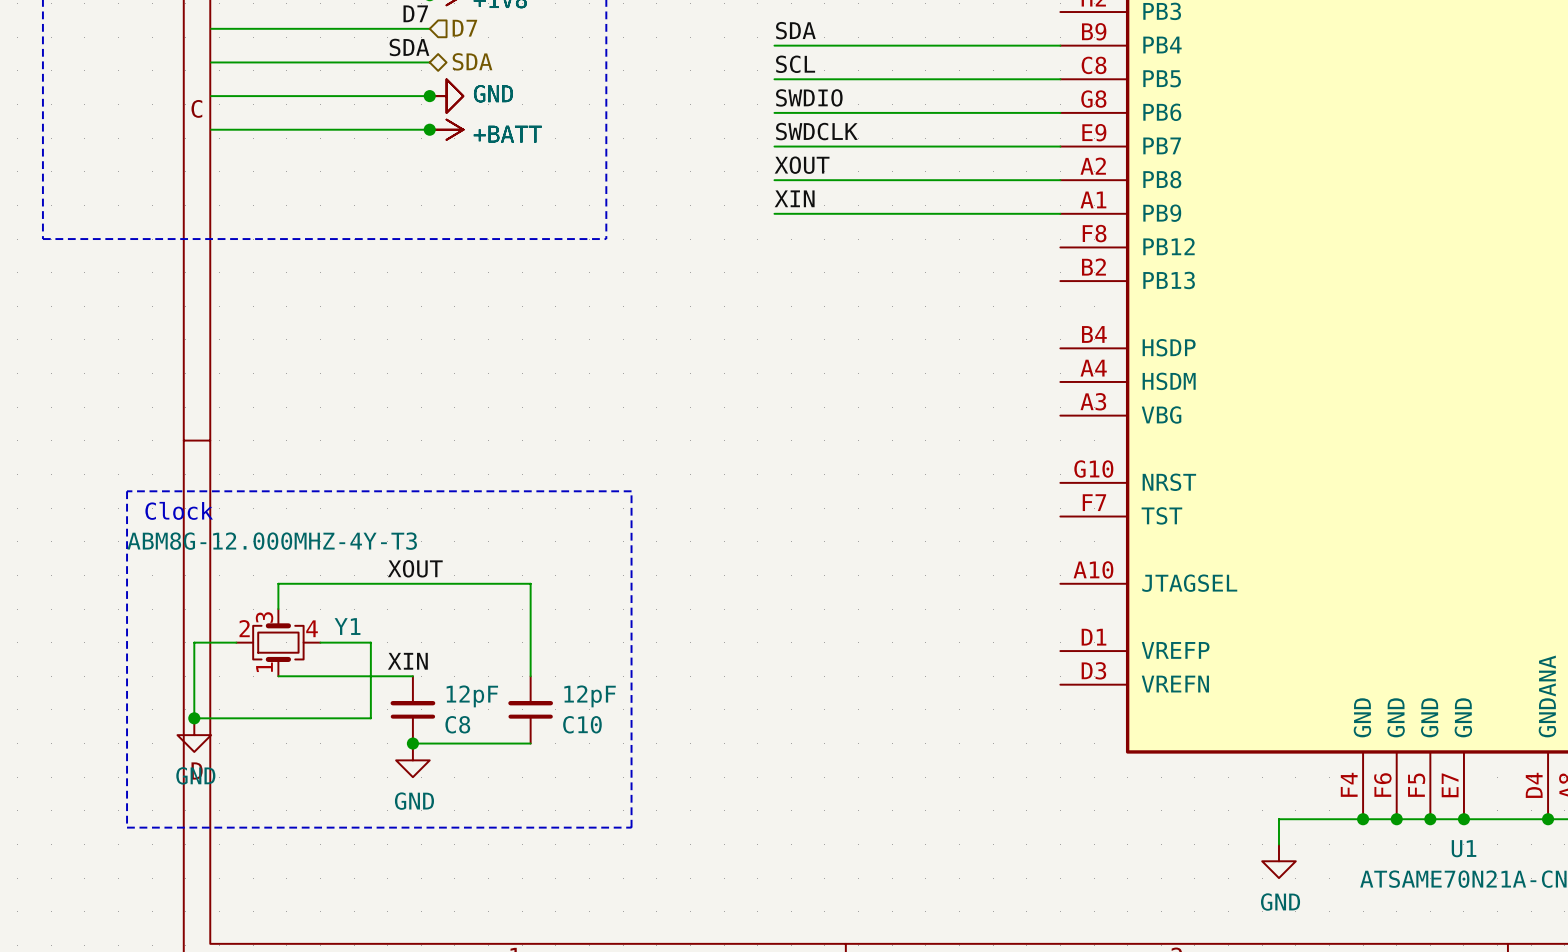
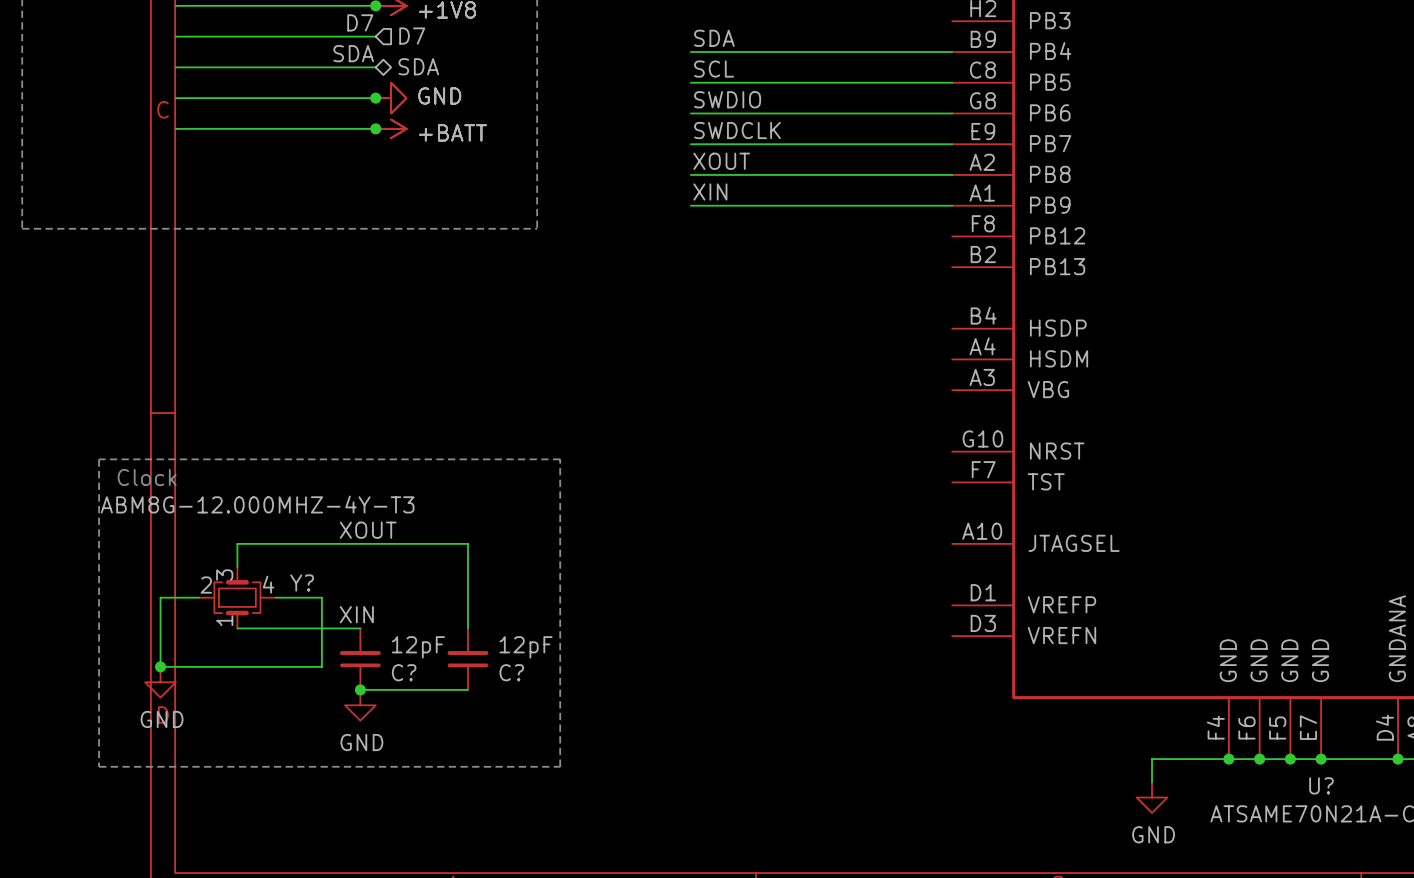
Y1 name: Y1 (347, 626) -> Y? (302, 582)
C8 name: C8 (457, 724) -> C? (404, 672)
C10 name: C10 (582, 724) -> C? (511, 672)
U1 name: U1 (1464, 848) -> U? (1321, 785)

